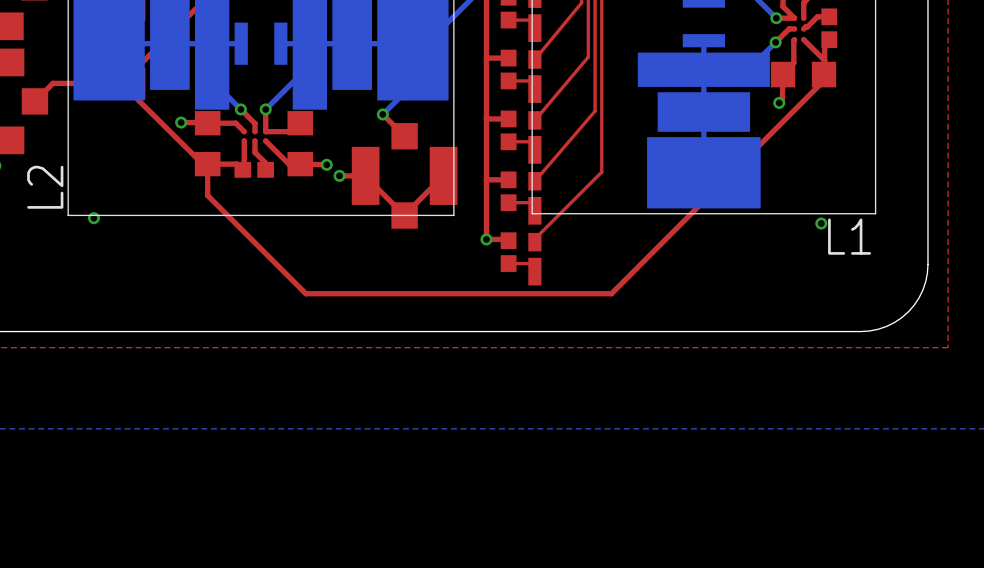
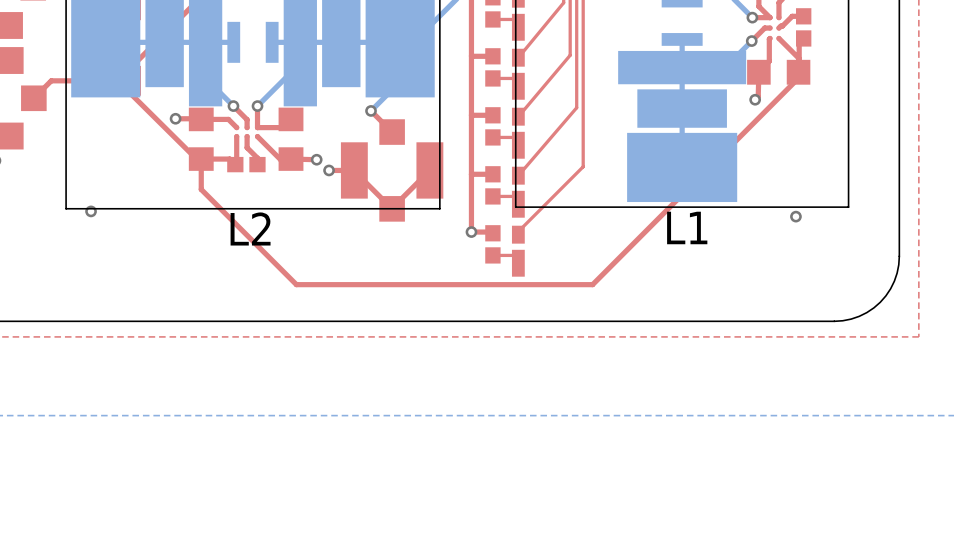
L2 name rotation: 0° (45, 187) -> 90° clockwise (250, 228)
L2 name position: L2 (45, 187) -> L2 (250, 228)
L1 name position: L1 (849, 236) -> L1 (687, 227)

